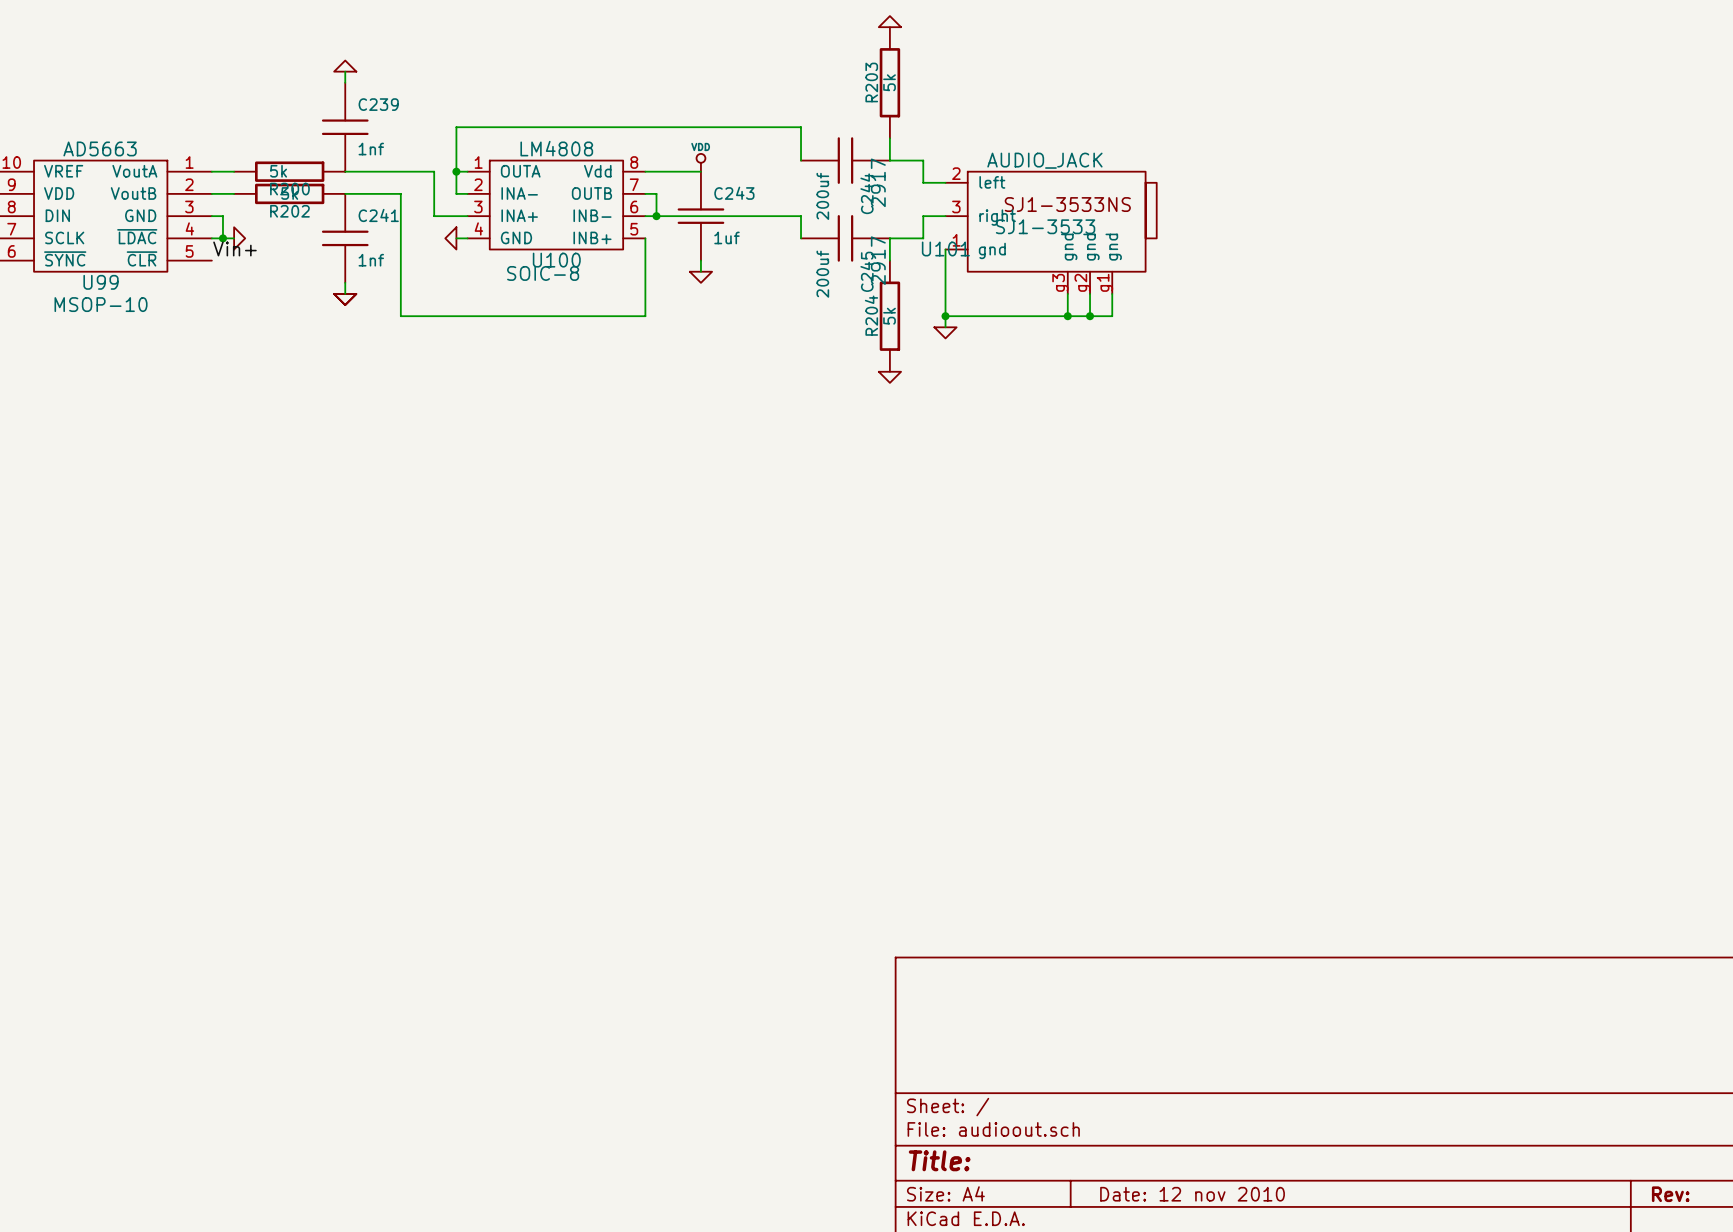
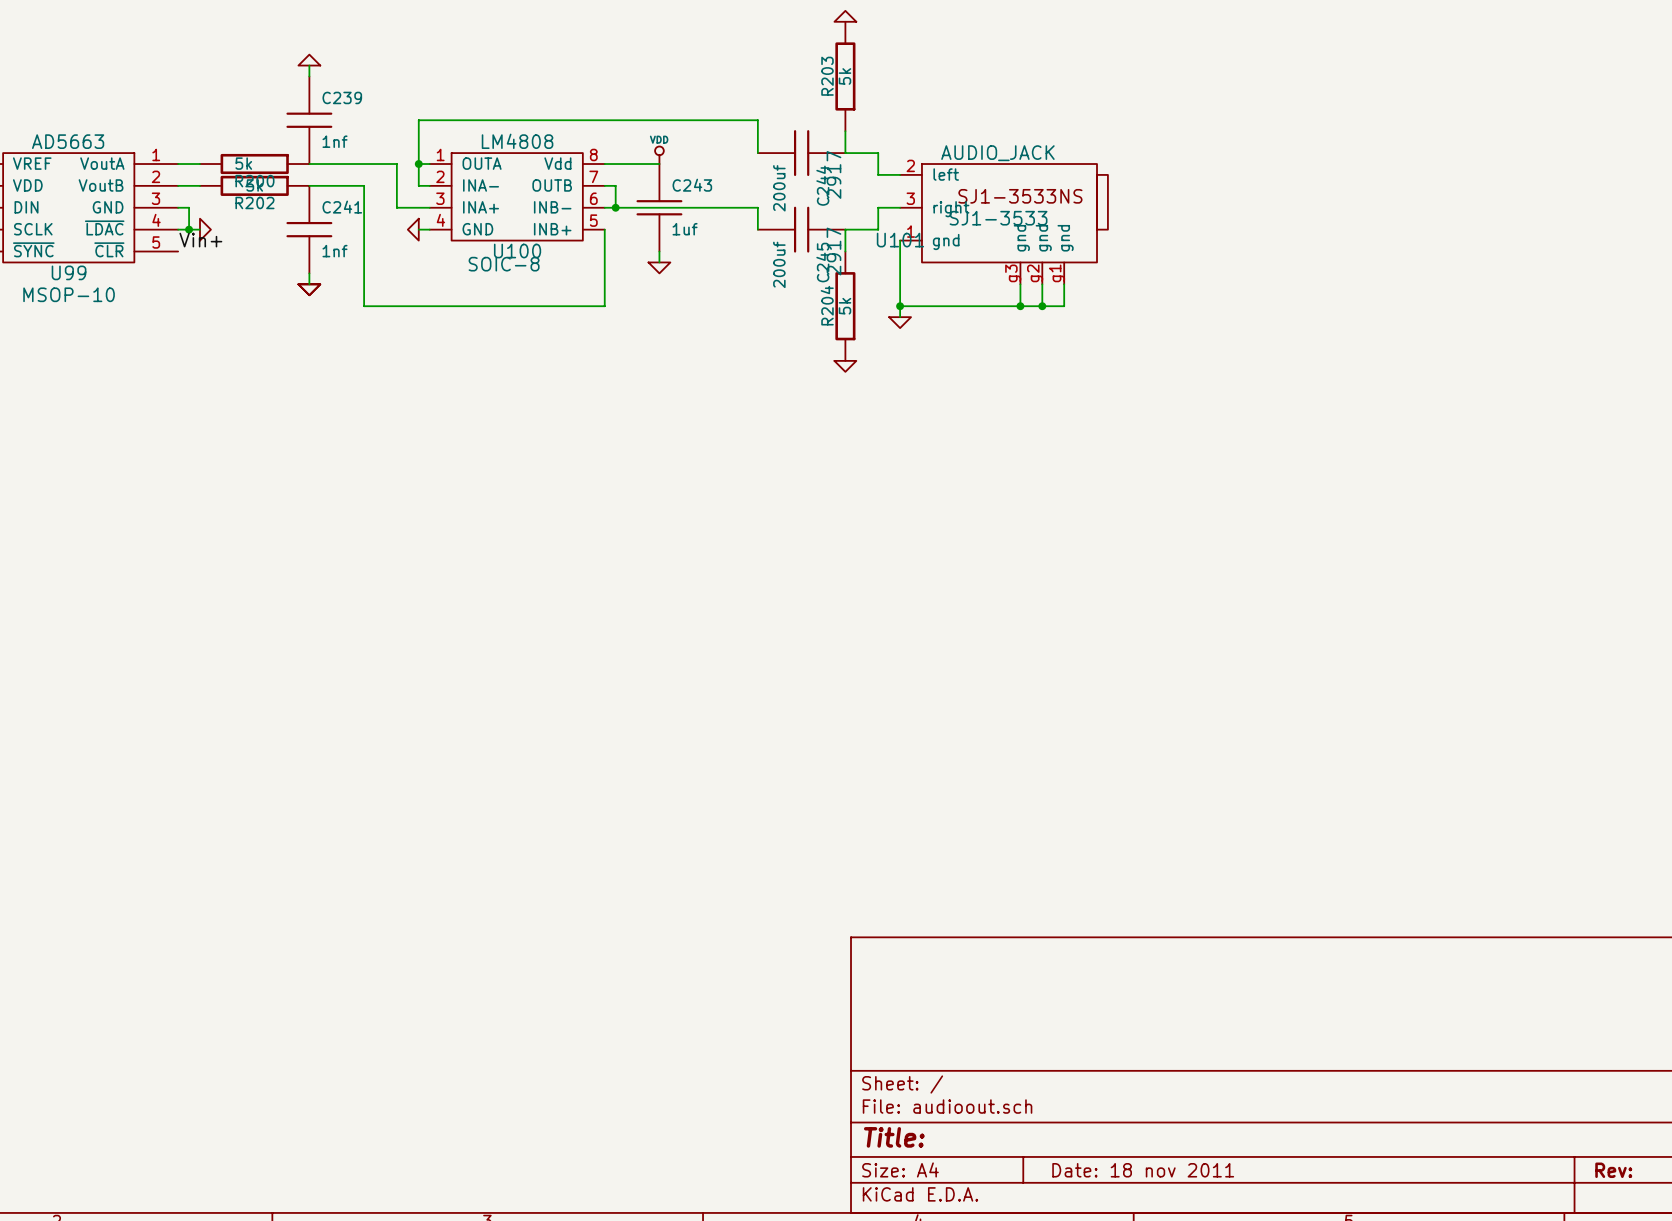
title block: Date: 12 nov 2010 (1192, 1194) -> Date: 18 nov 2011 (1143, 1170)

